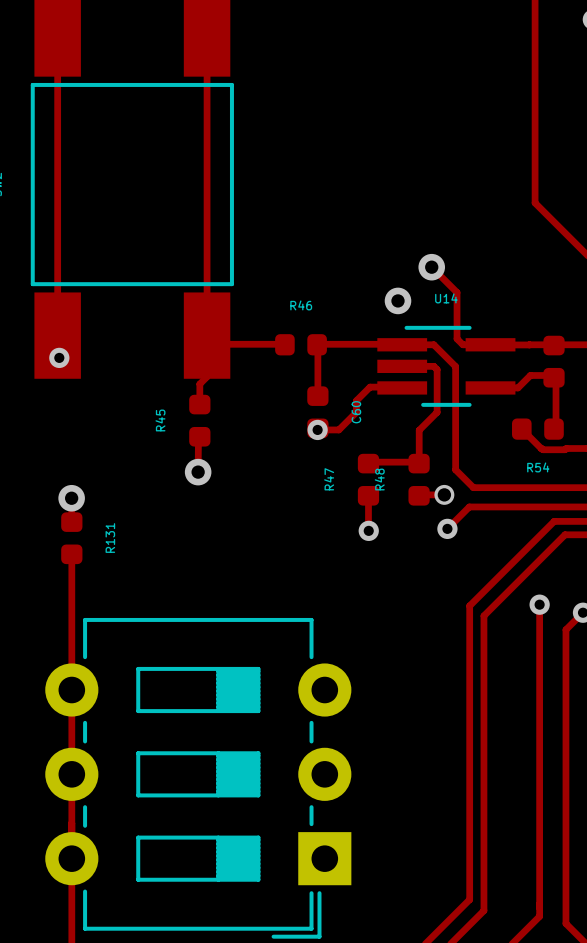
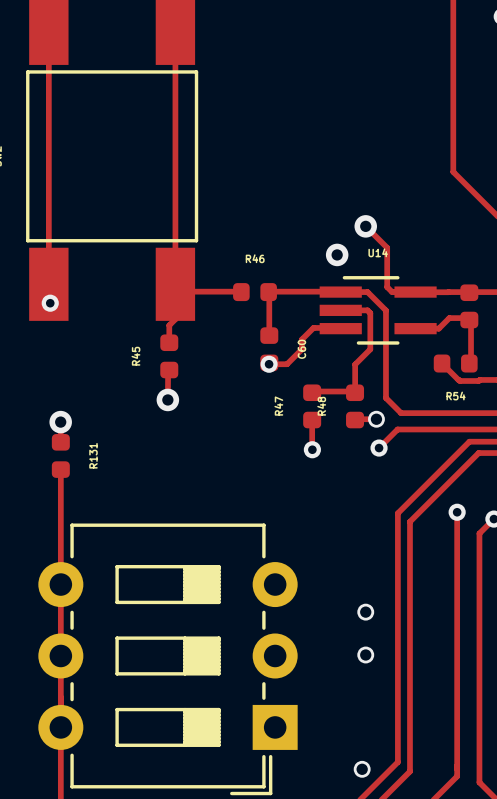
via: none -> (365, 612)
via: none -> (365, 655)
via: none -> (362, 769)

